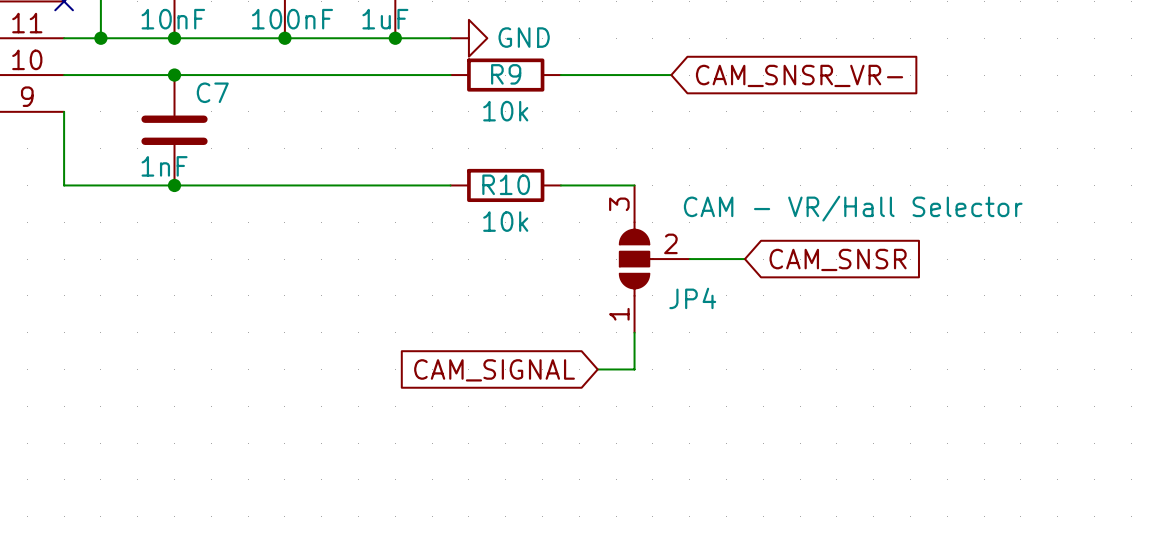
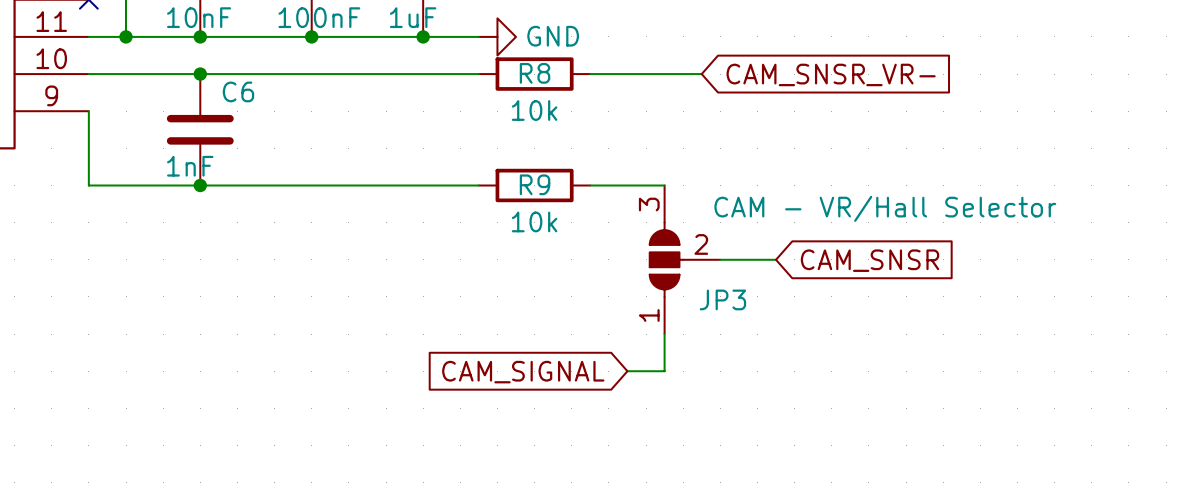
R9 name: R9 (506, 74) -> R8 (535, 73)
C7 name: C7 (212, 92) -> C6 (238, 91)
R10 name: R10 (506, 184) -> R9 (535, 184)
JP4 name: JP4 (692, 298) -> JP3 (722, 299)

